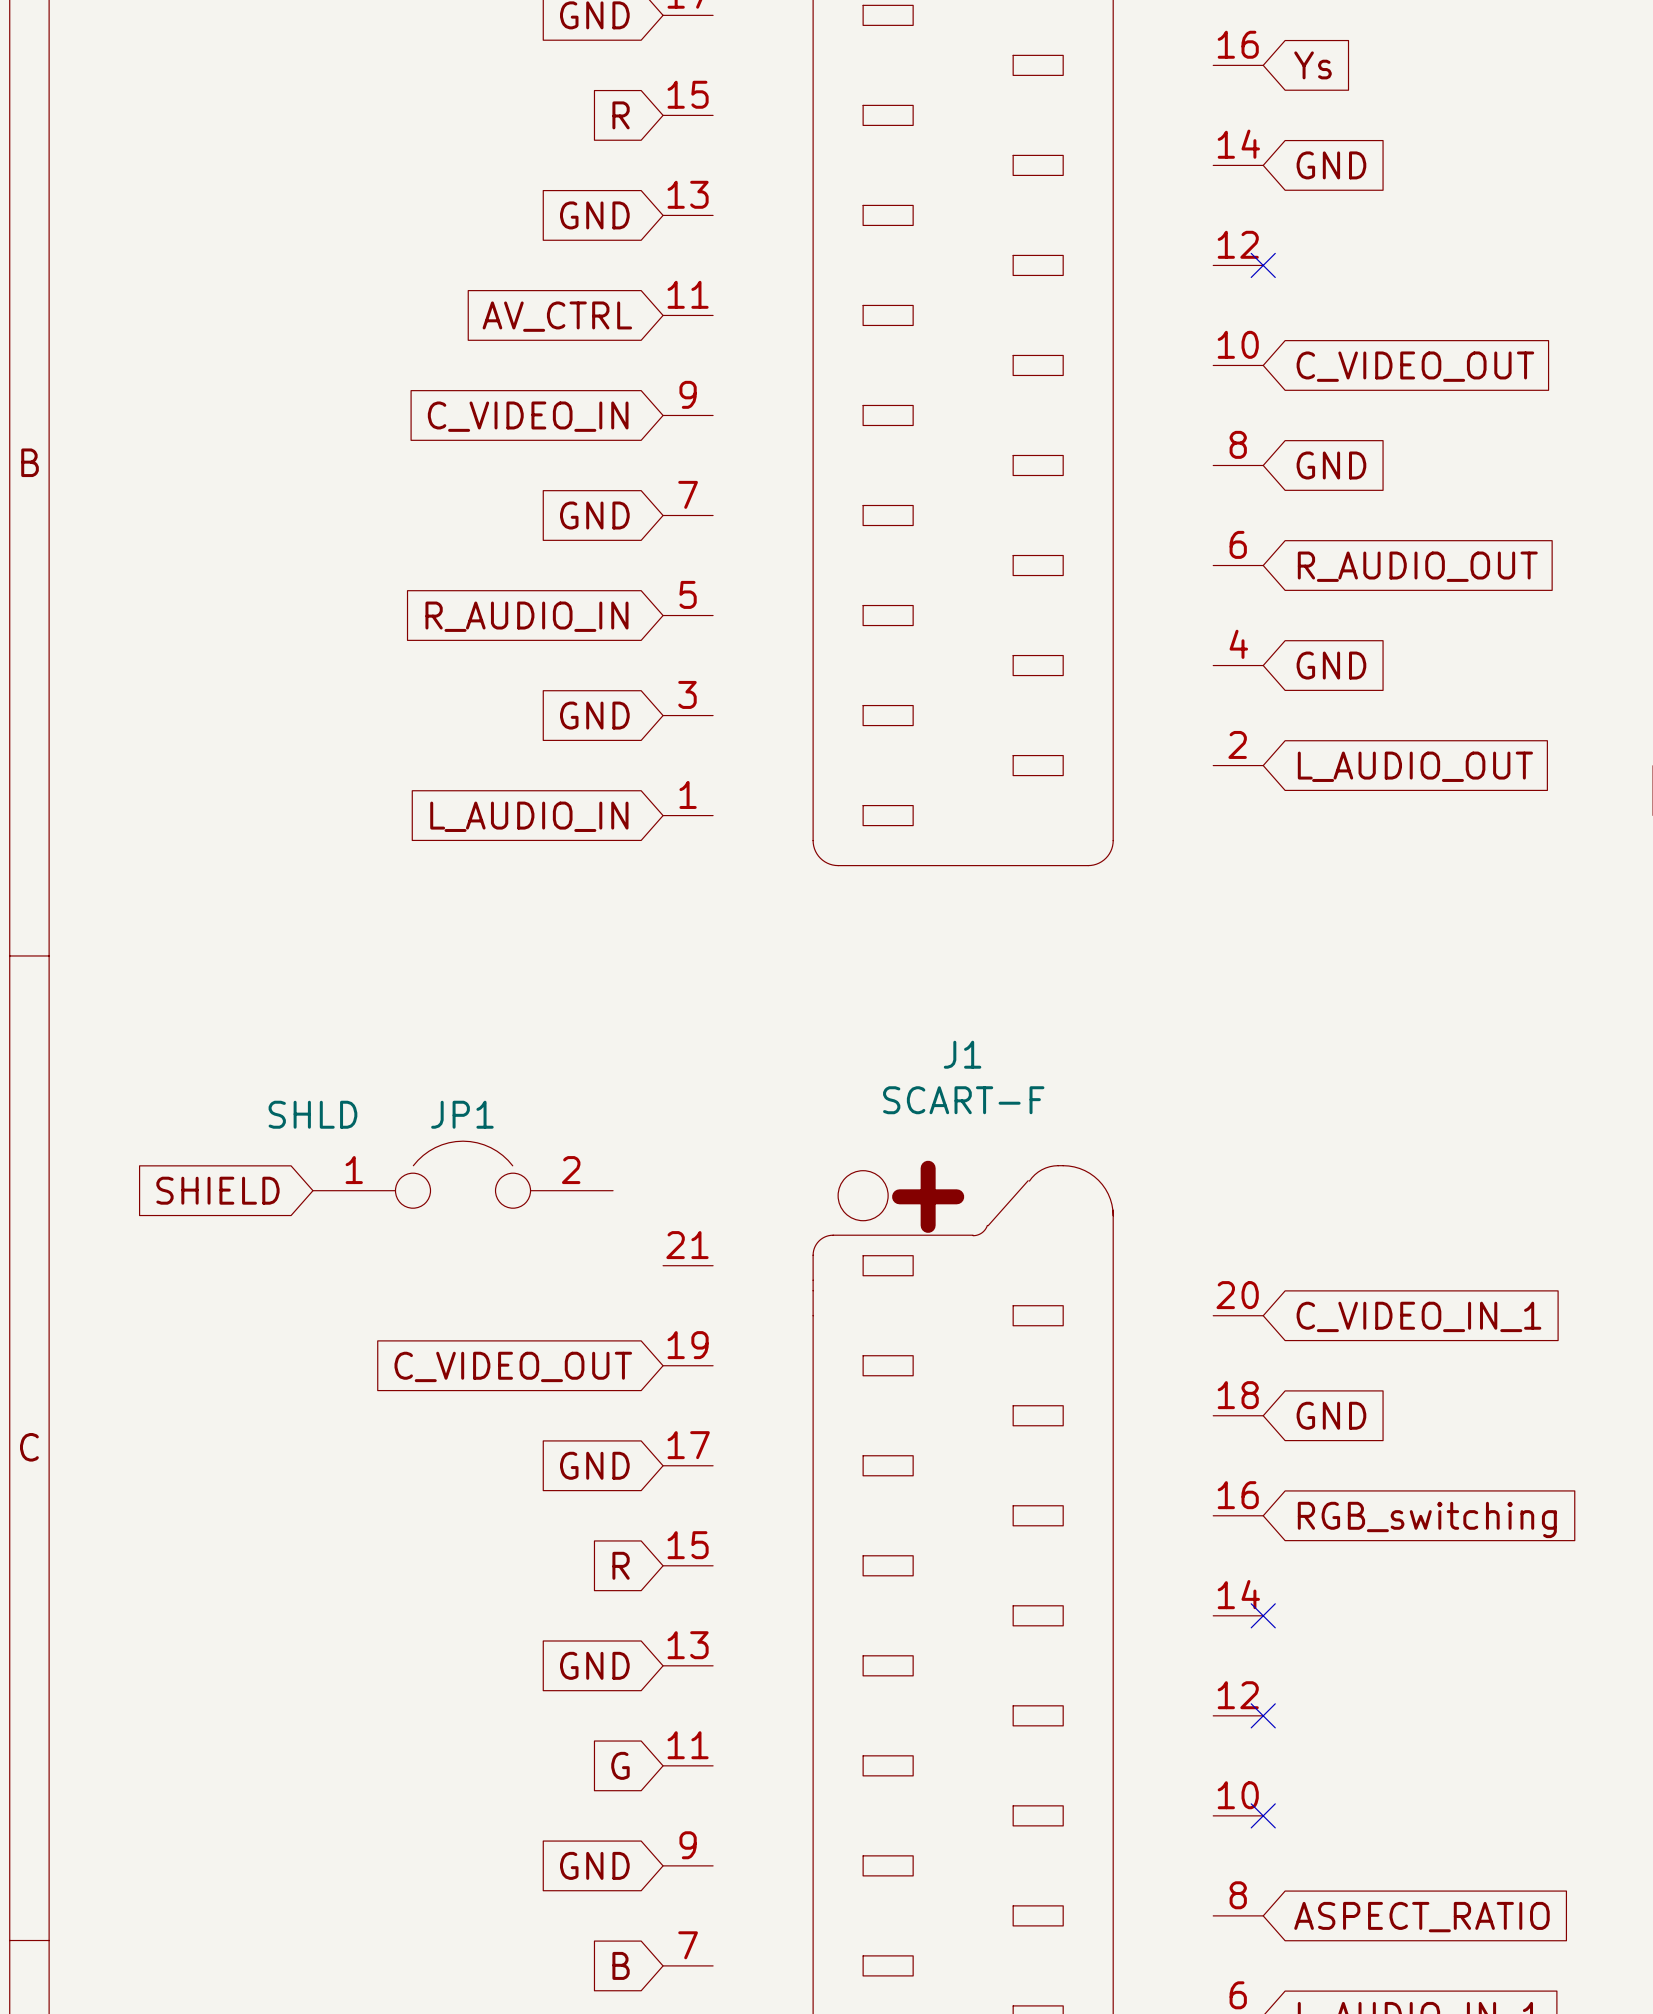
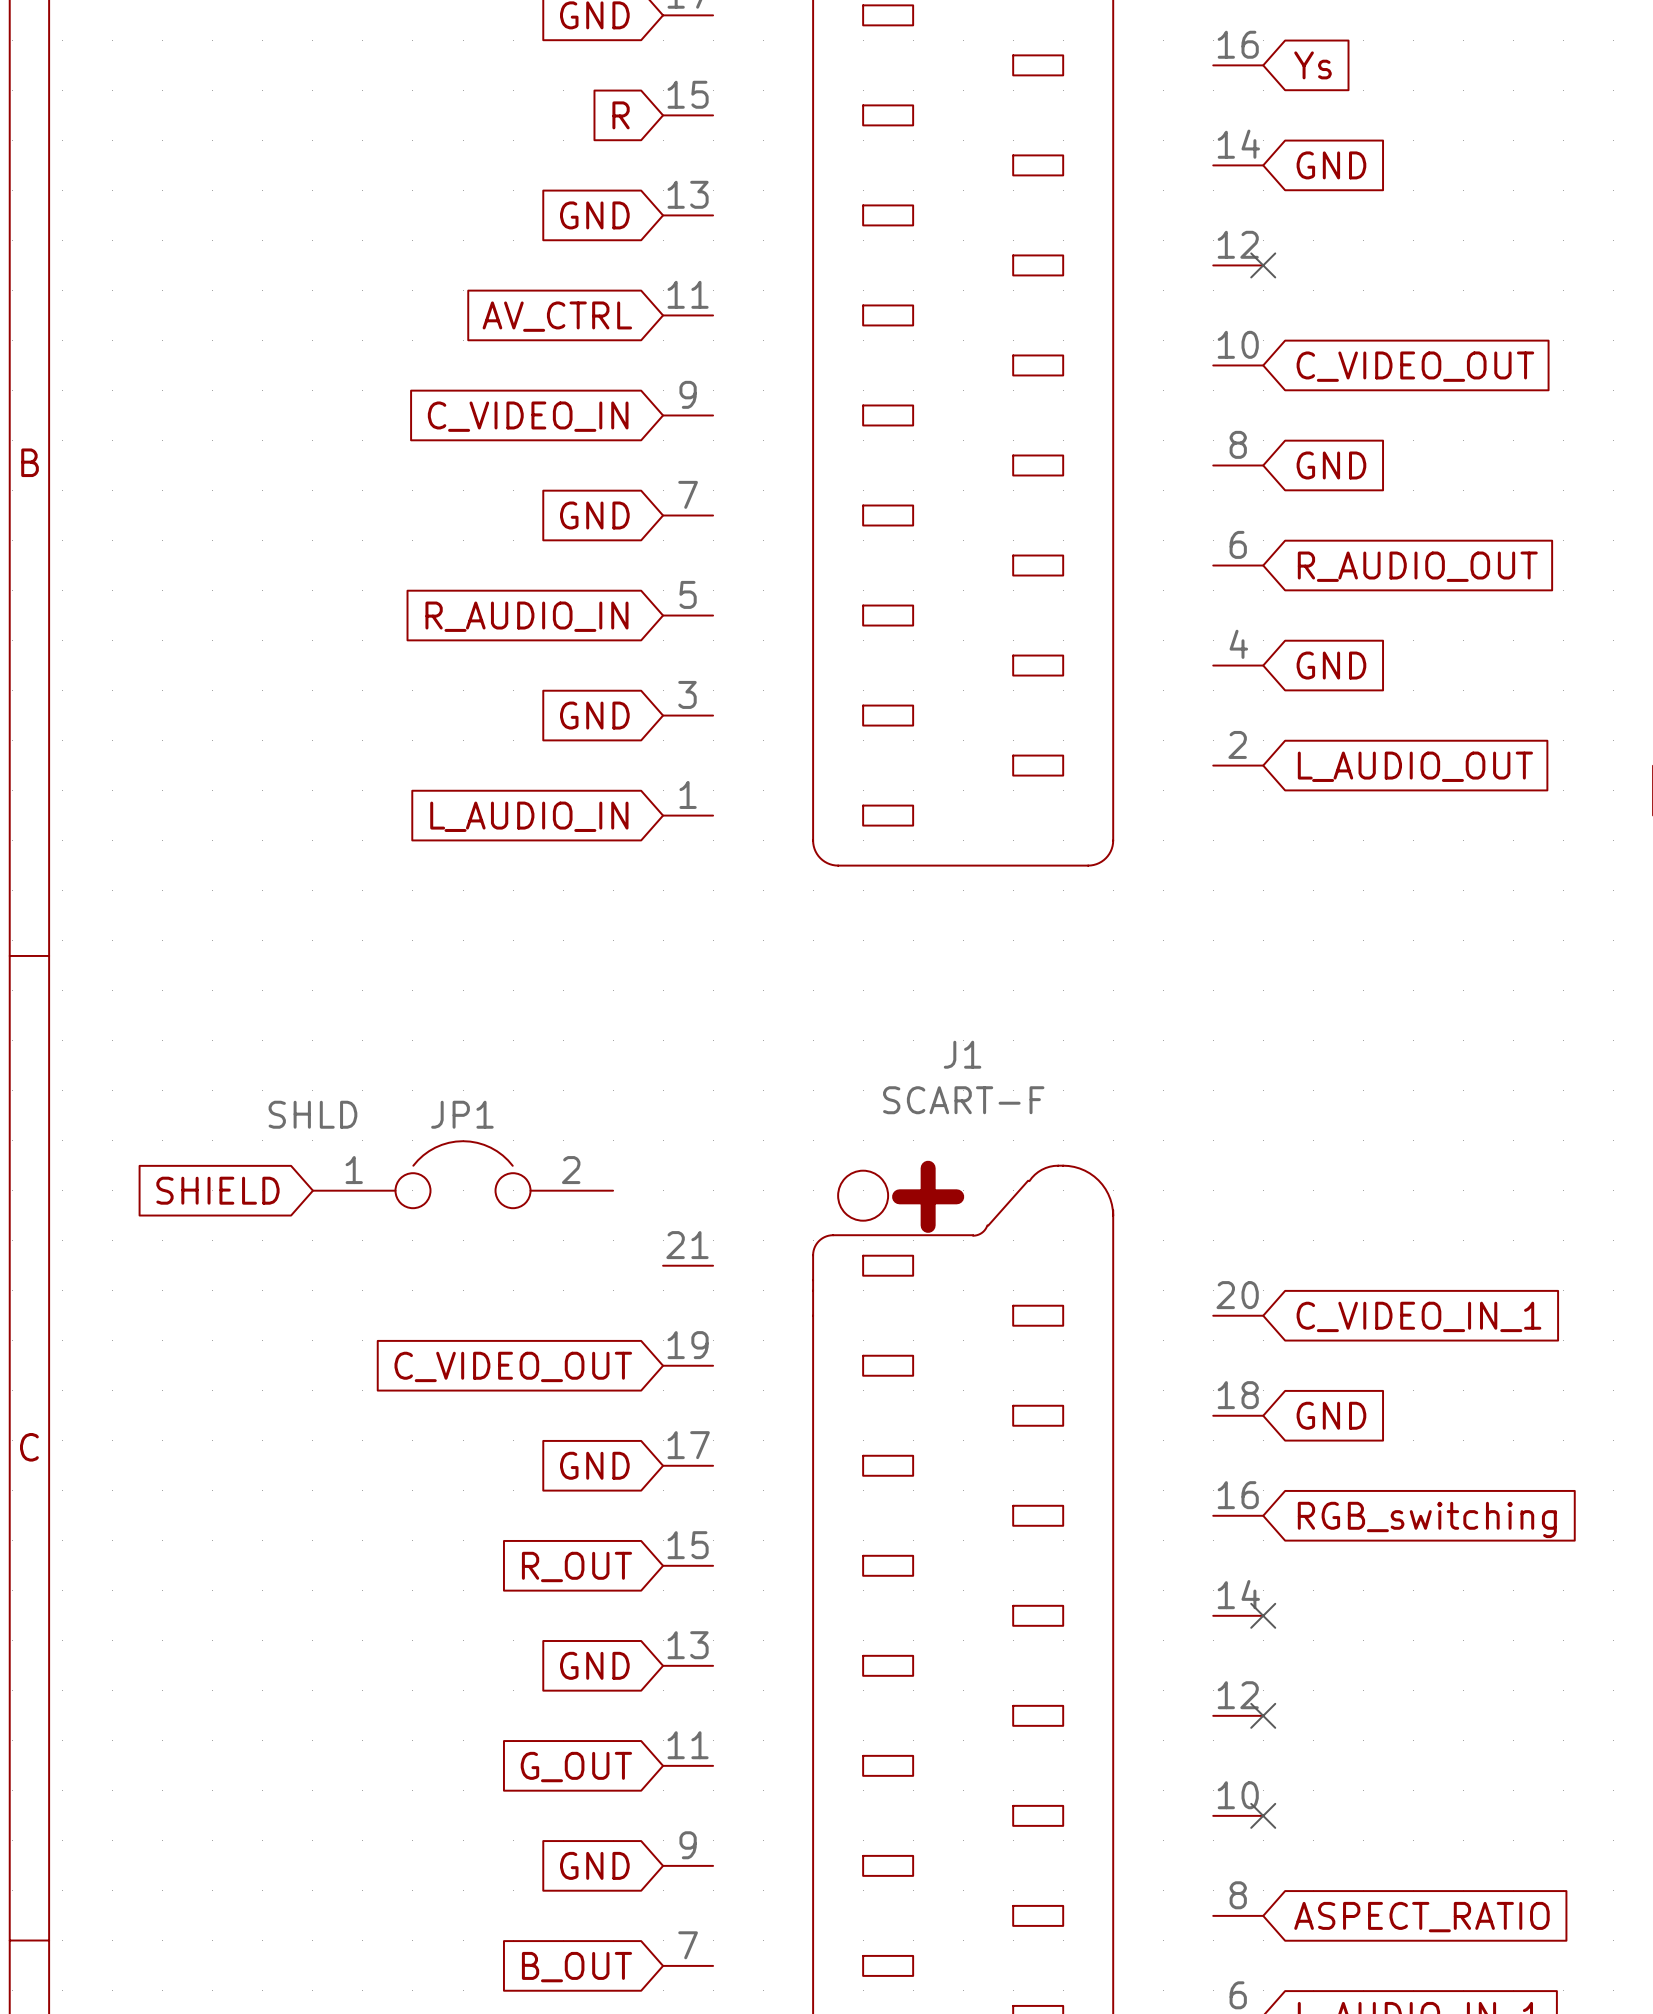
global label: R (621, 1565) -> R_OUT (576, 1566)
global label: G (620, 1765) -> G_OUT (576, 1767)
global label: B (621, 1965) -> B_OUT (576, 1967)

